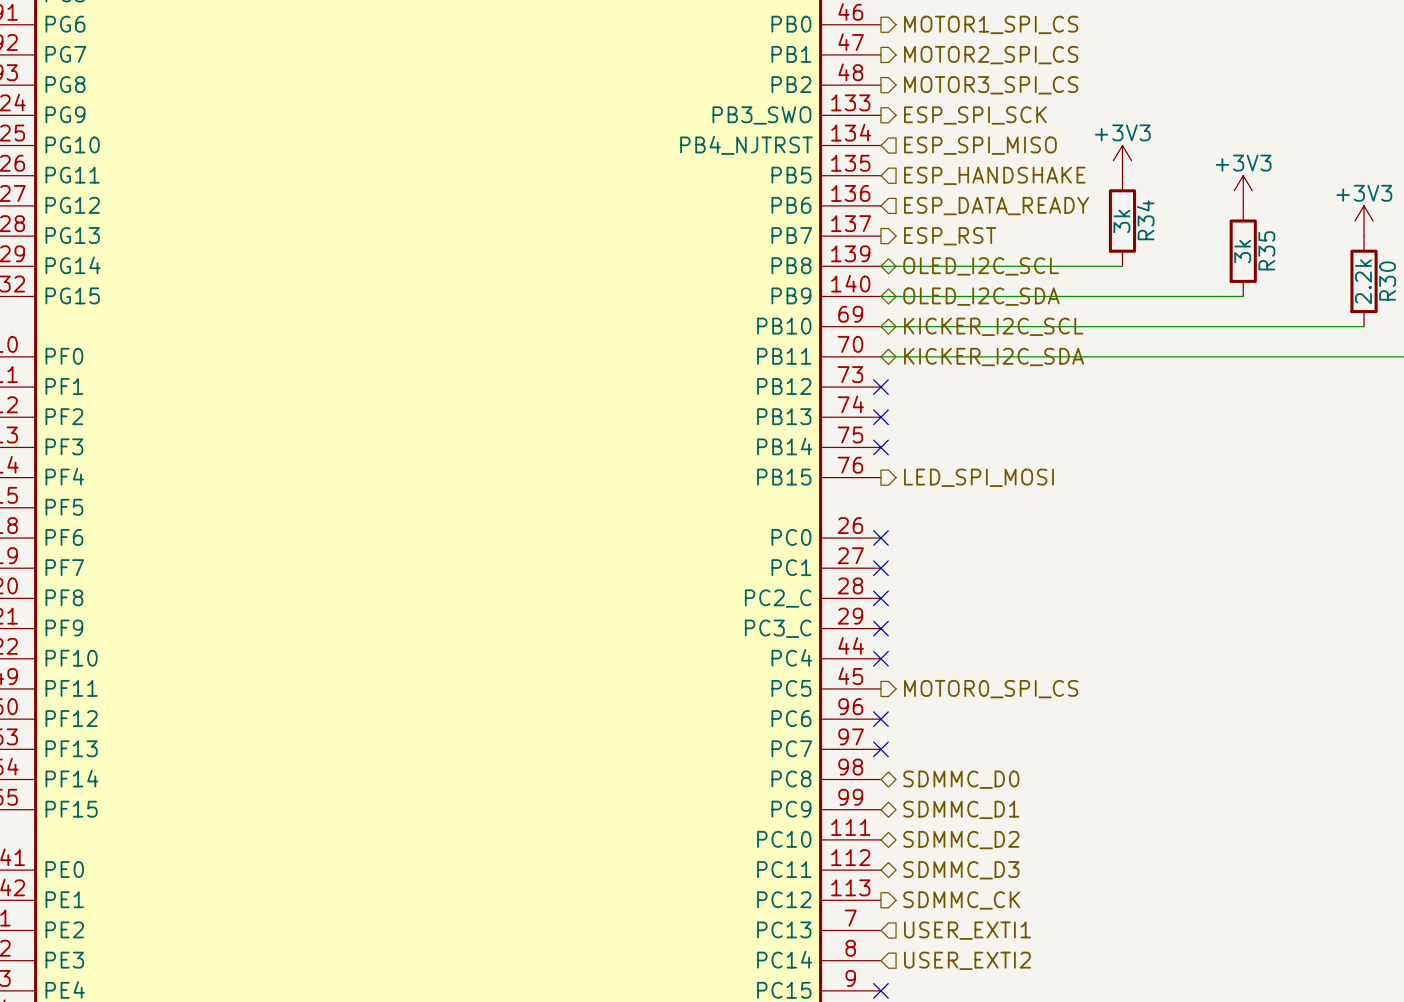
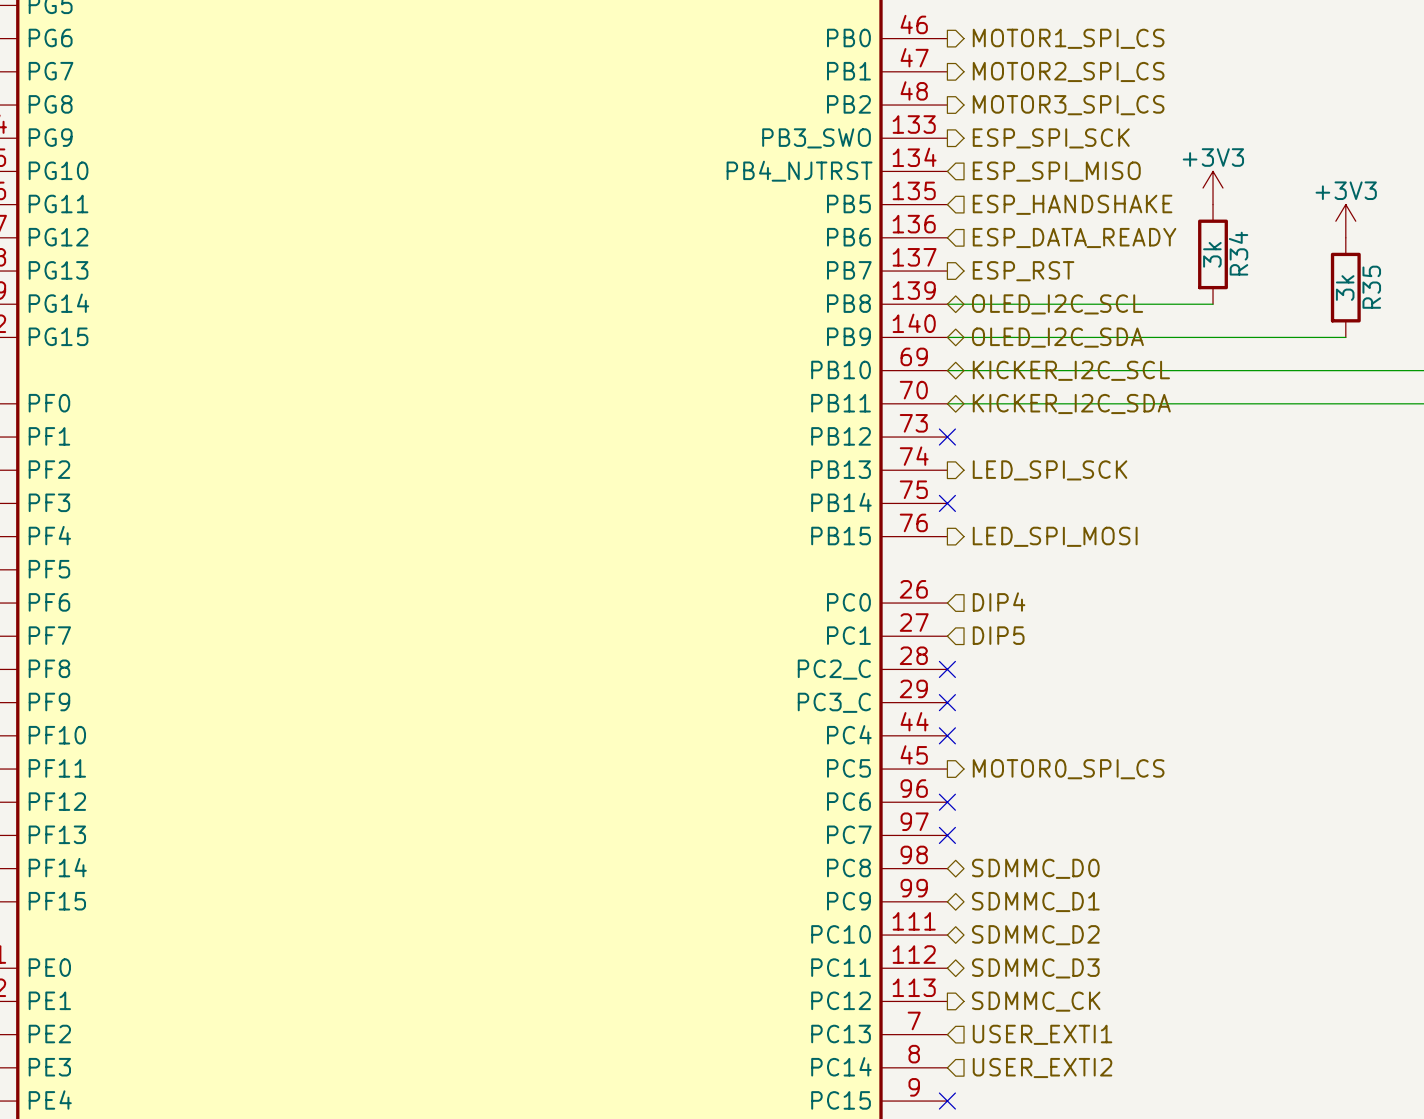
no-connect mark: (880, 417) -> none
hierarchical label: none -> LED_SPI_SCK (1050, 470)
hierarchical label: none -> DIP4 (999, 602)
no-connect mark: (880, 538) -> none
hierarchical label: none -> DIP5 (998, 635)
no-connect mark: (880, 568) -> none

